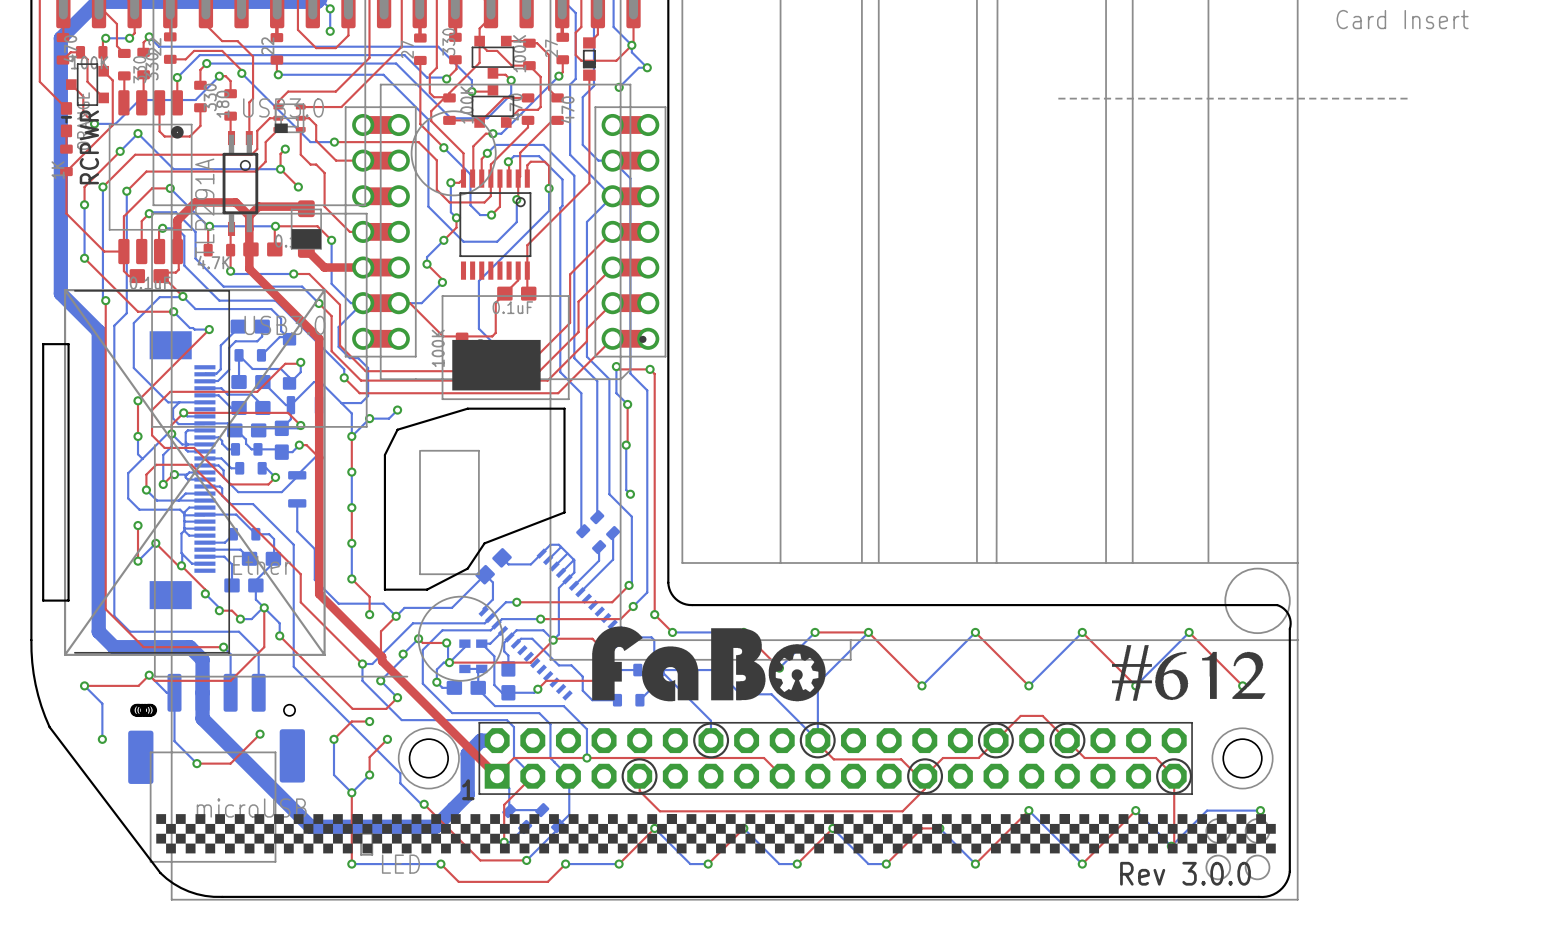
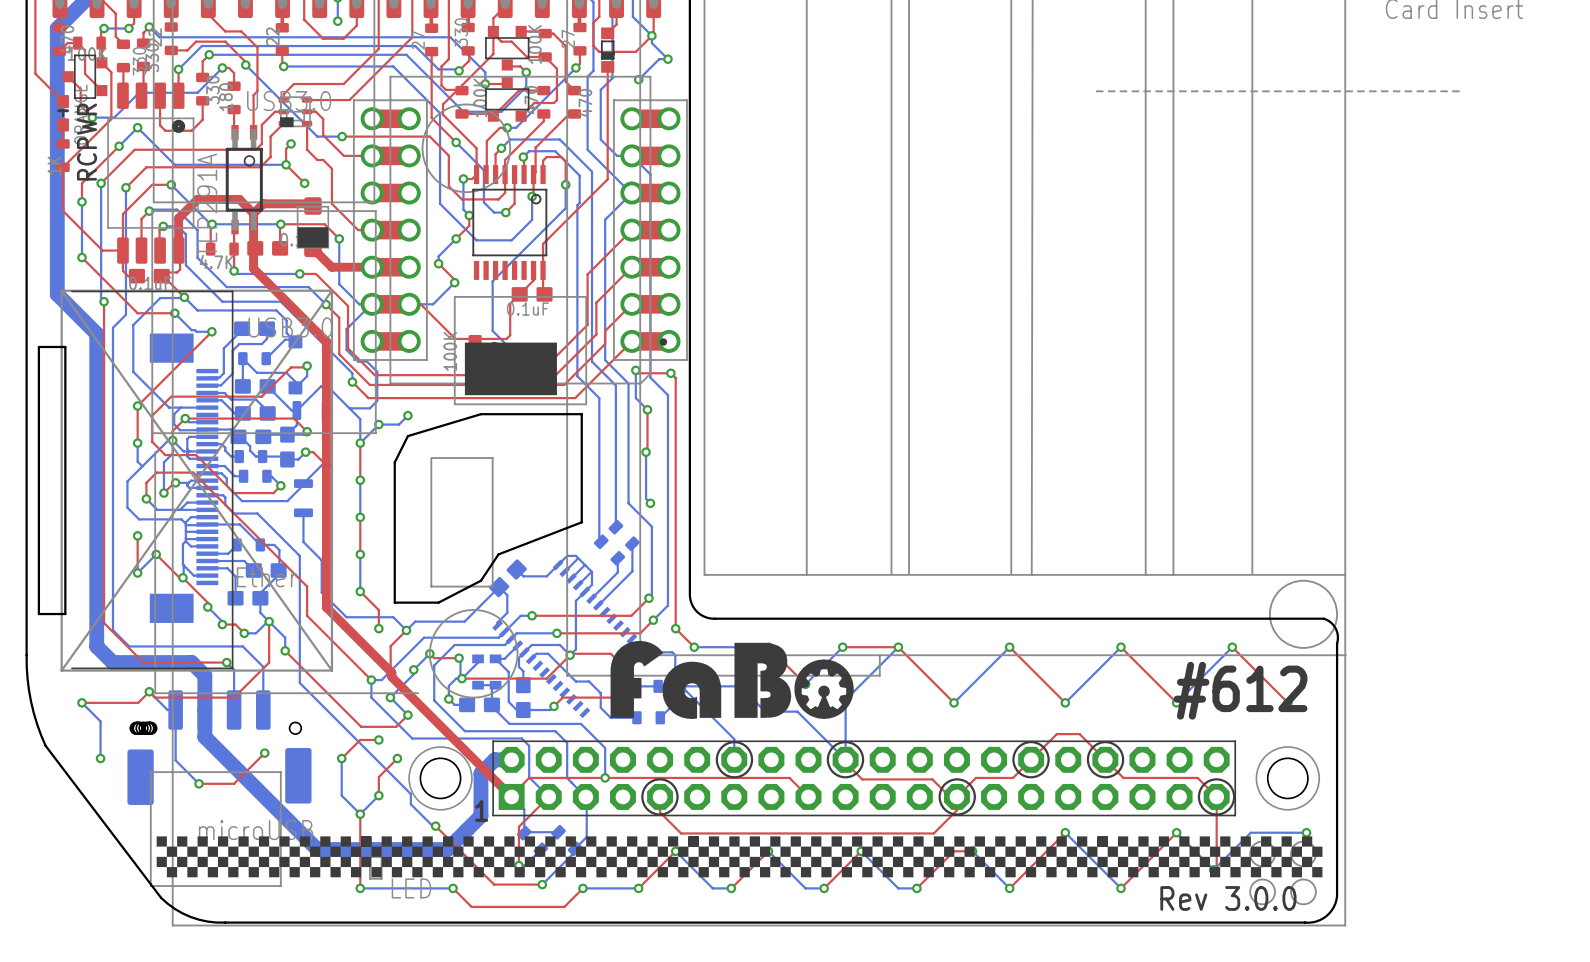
drawing: [1112, 645, 1266, 701] -> none
text: none -> #612 (1240, 690)

